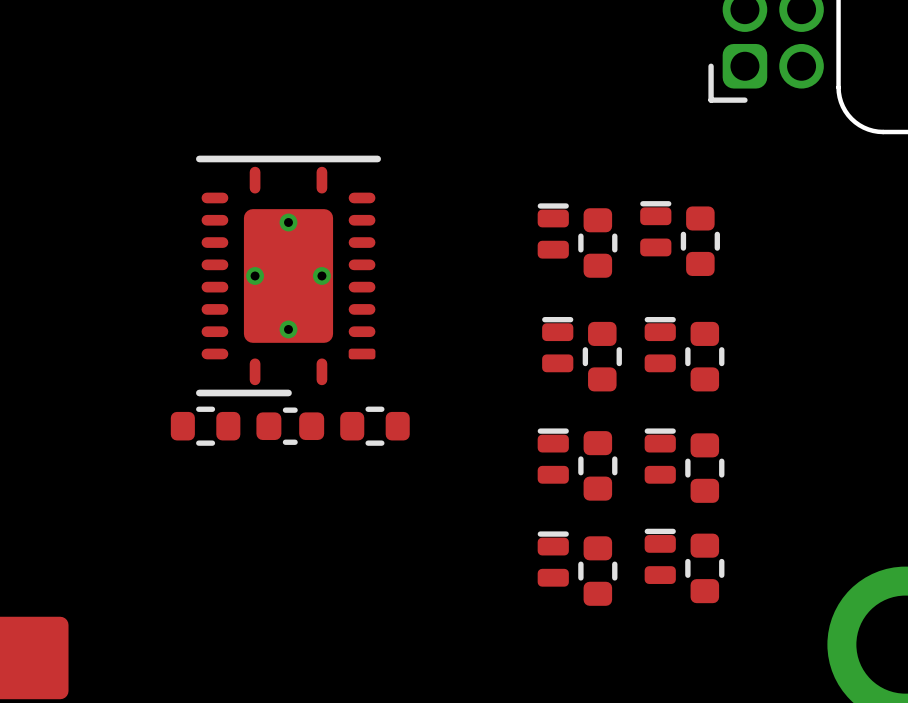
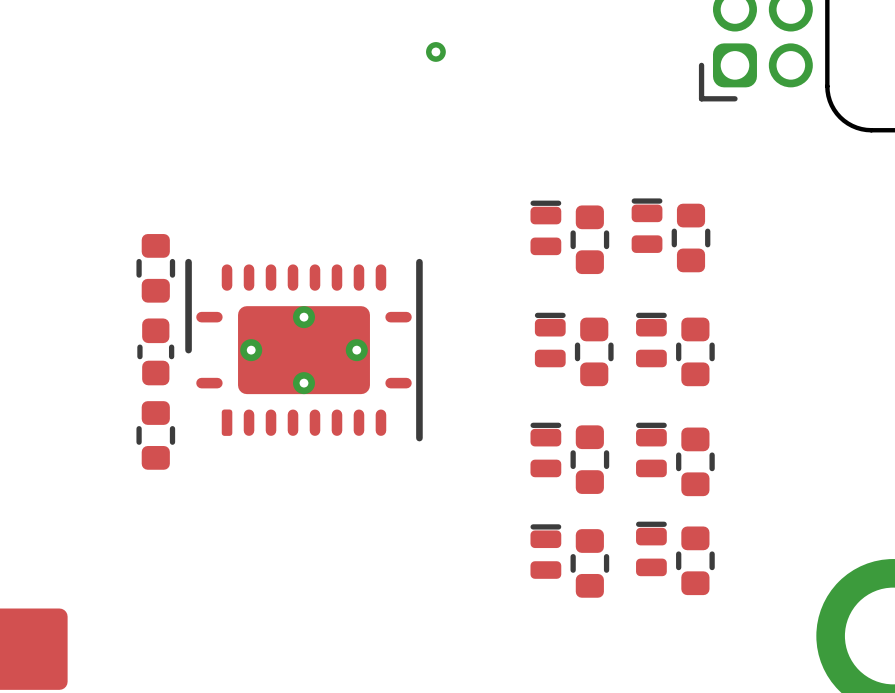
via: none -> (435, 51)
part: none -> (155, 268)
part: (288, 275) -> none
part: none -> (303, 350)
part rotation: 0° (205, 426) -> 90° clockwise (155, 435)
part position: (205, 426) -> (155, 435)
part rotation: 0° (290, 426) -> 90° clockwise (155, 351)
part position: (290, 426) -> (155, 351)
part: (374, 426) -> none

